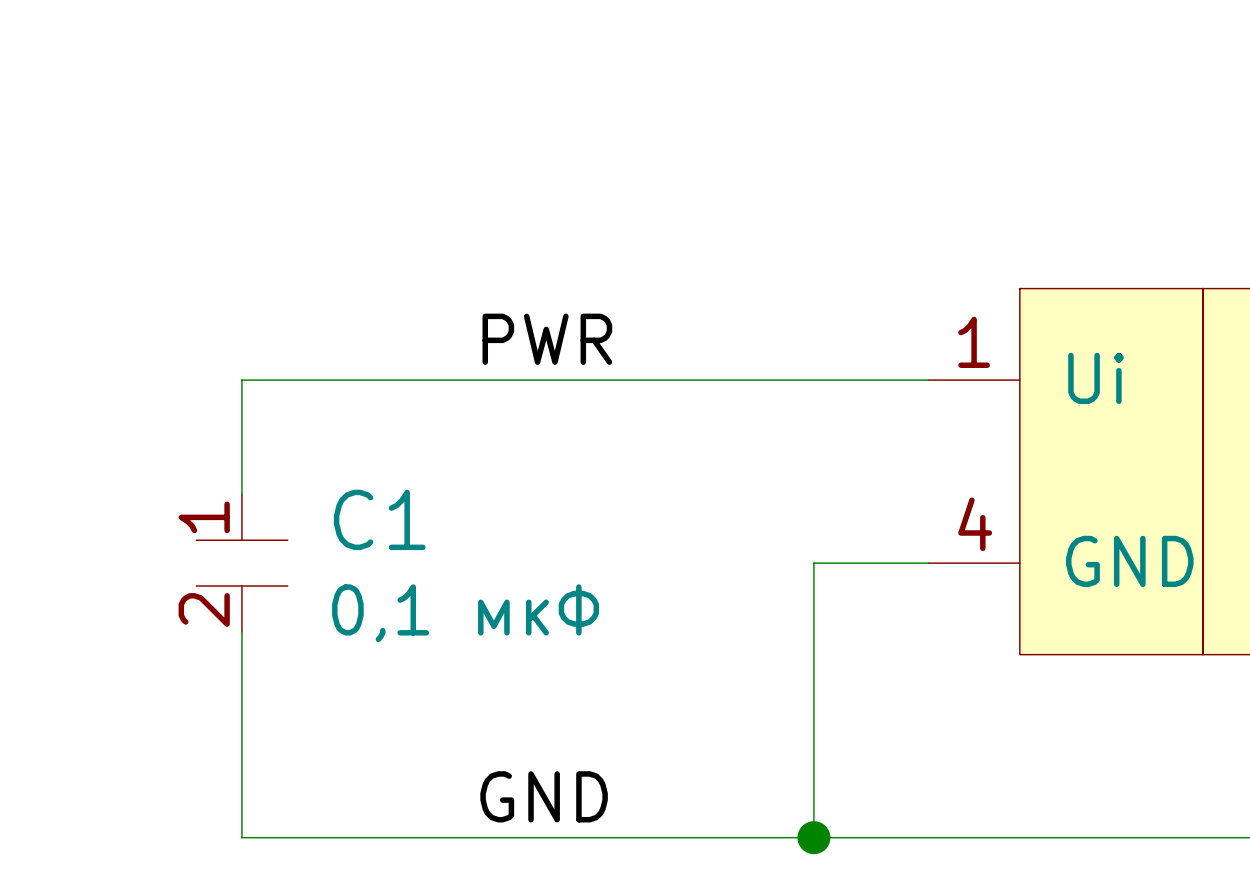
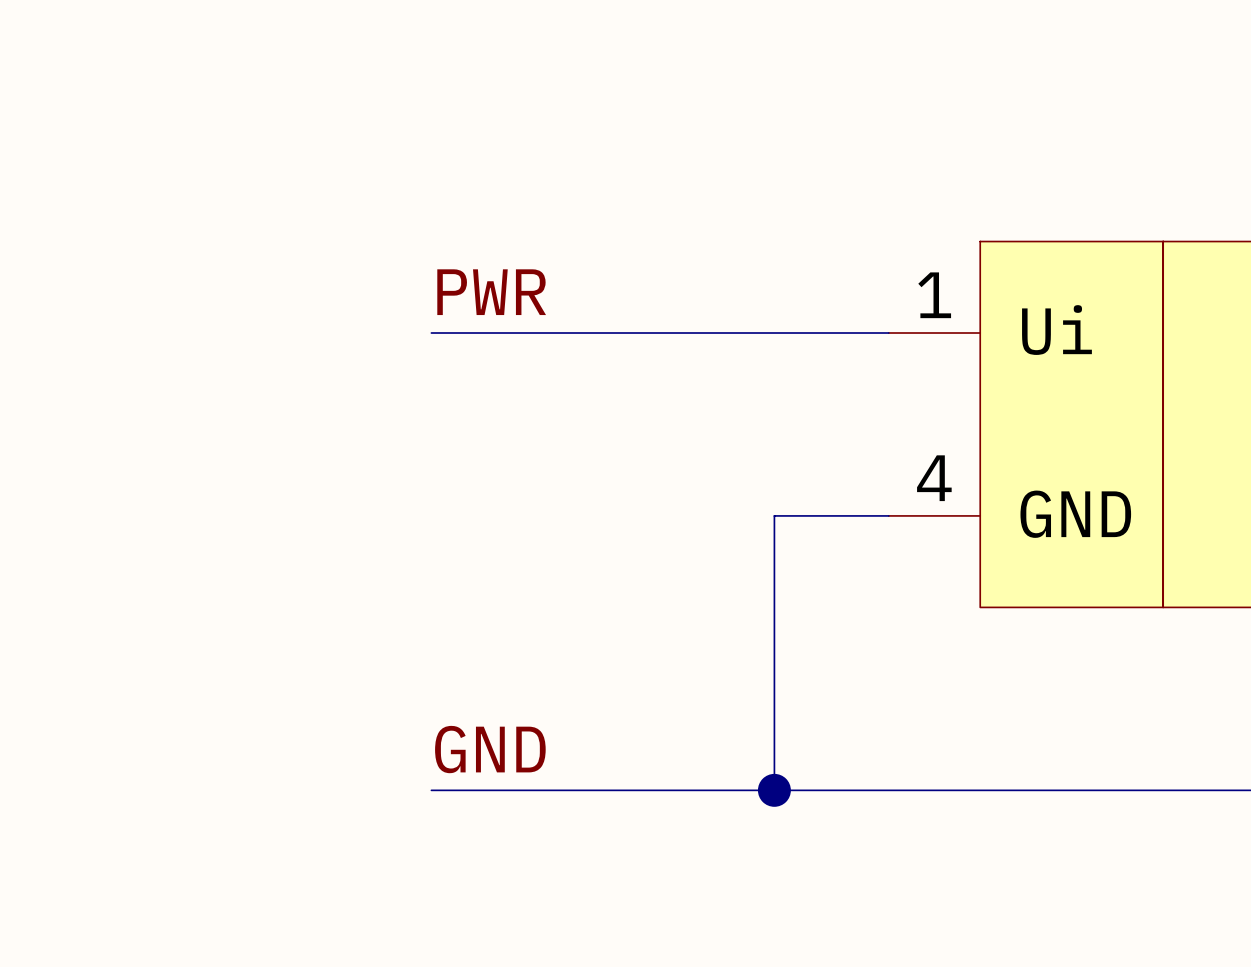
wire: (470, 380) (241, 380) (241, 494) -> none
C1: (241, 563) -> none
wire: (241, 631) (241, 837) (470, 837) -> none

